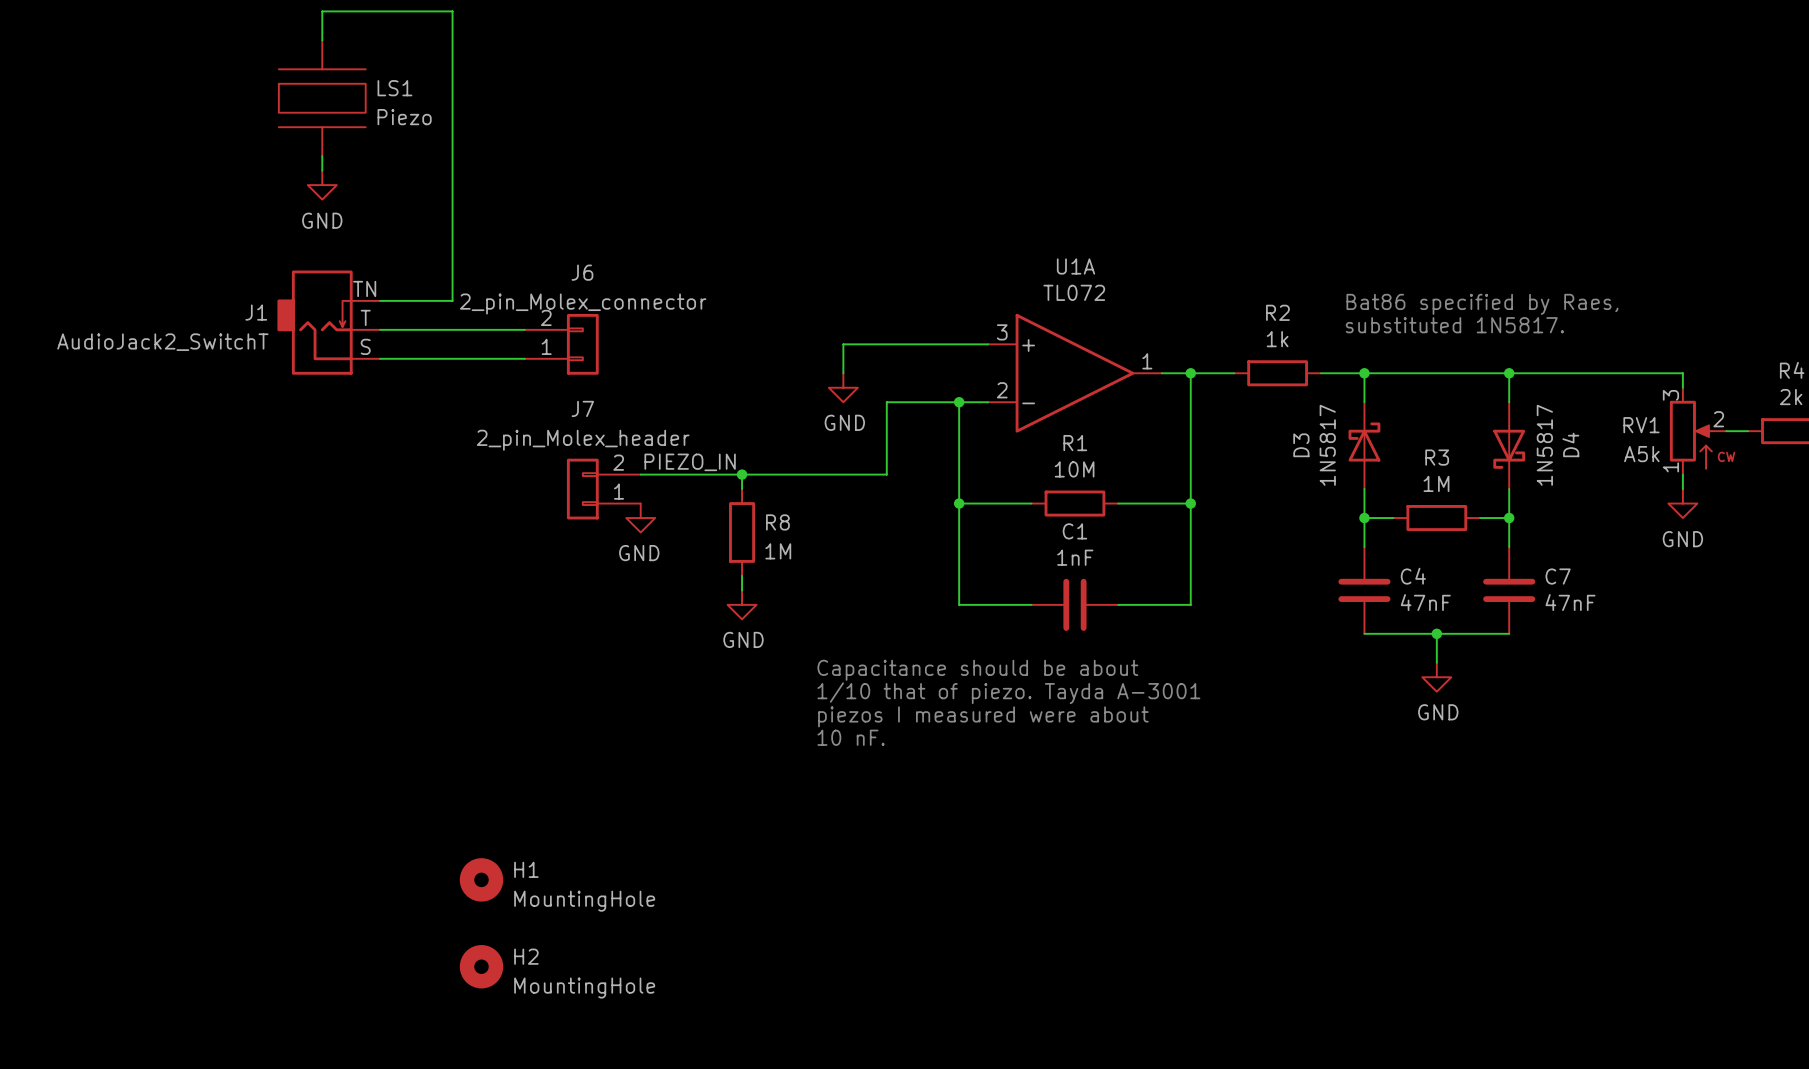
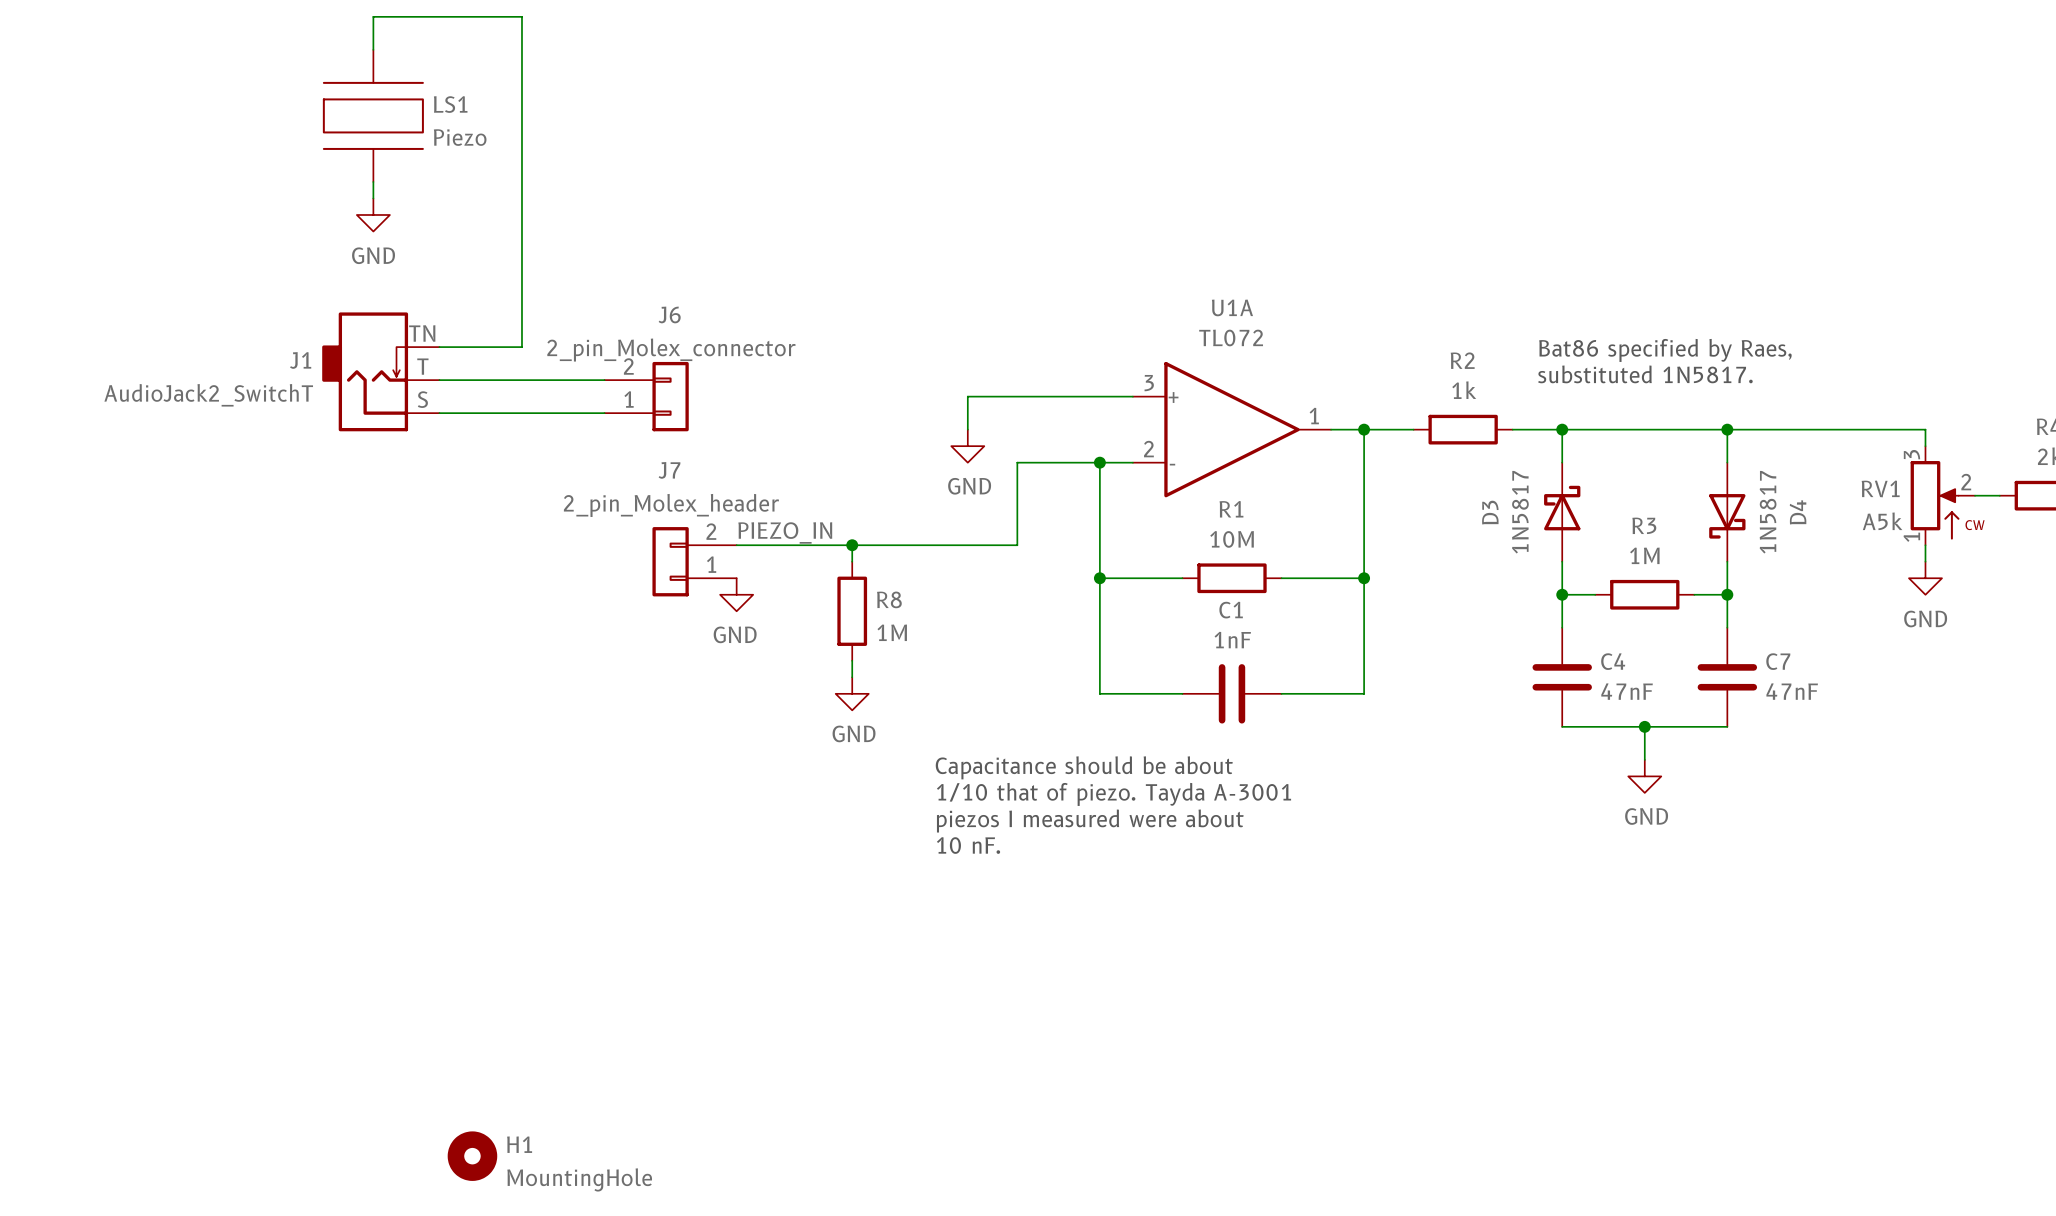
H1 position: (481, 879) -> (472, 1156)
H2: MountingHole (481, 966) -> none

